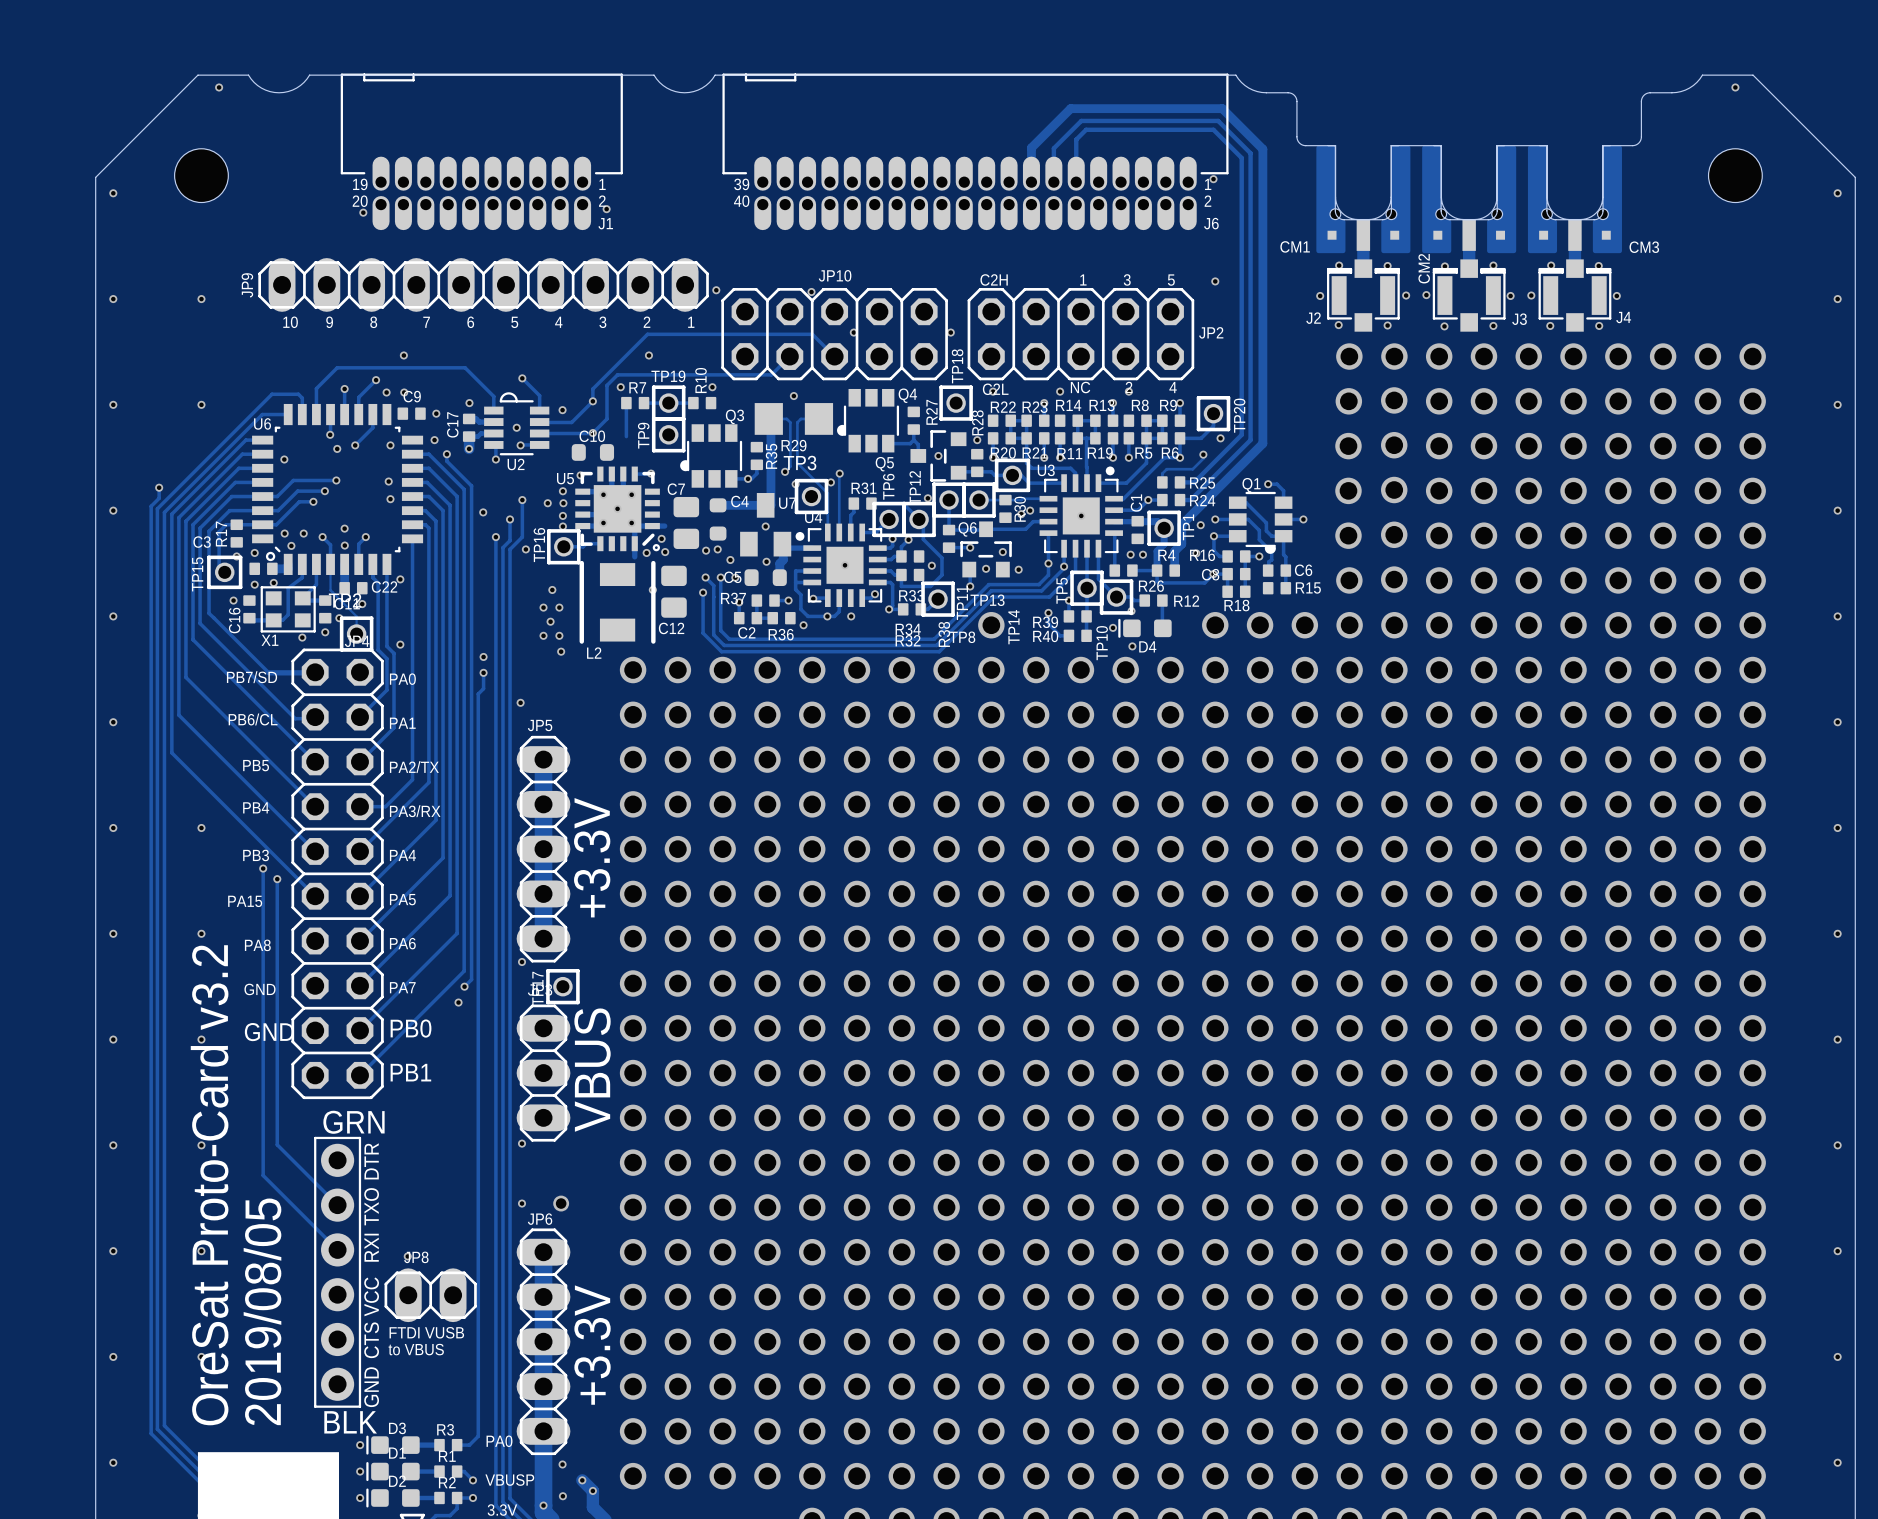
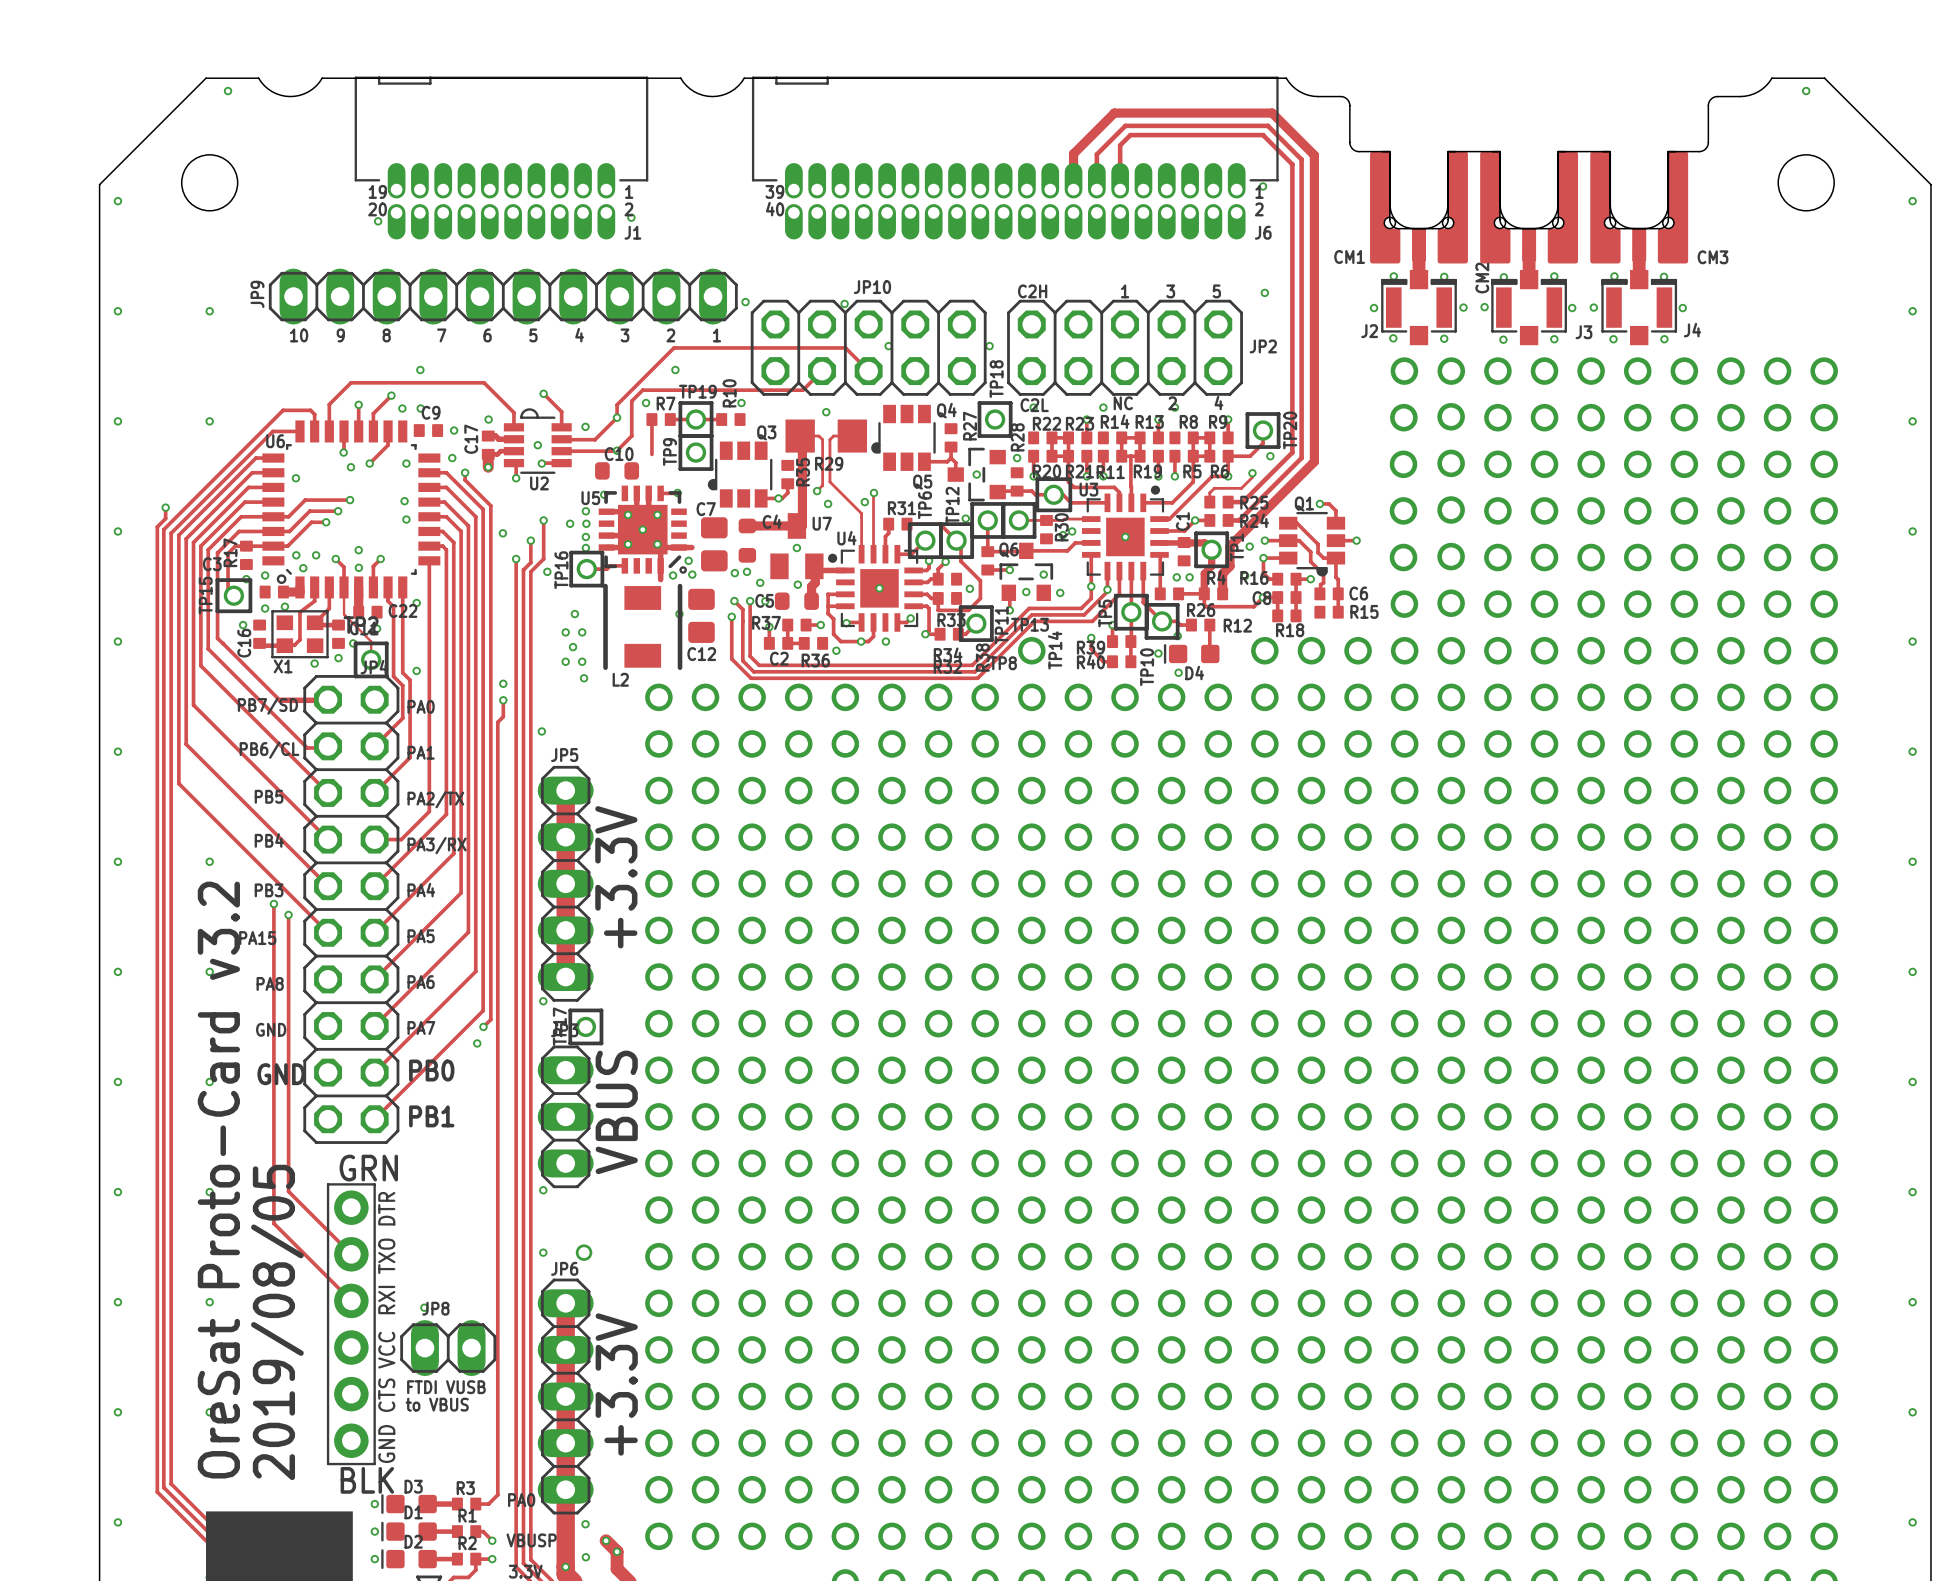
TP3: (811, 496) -> none

